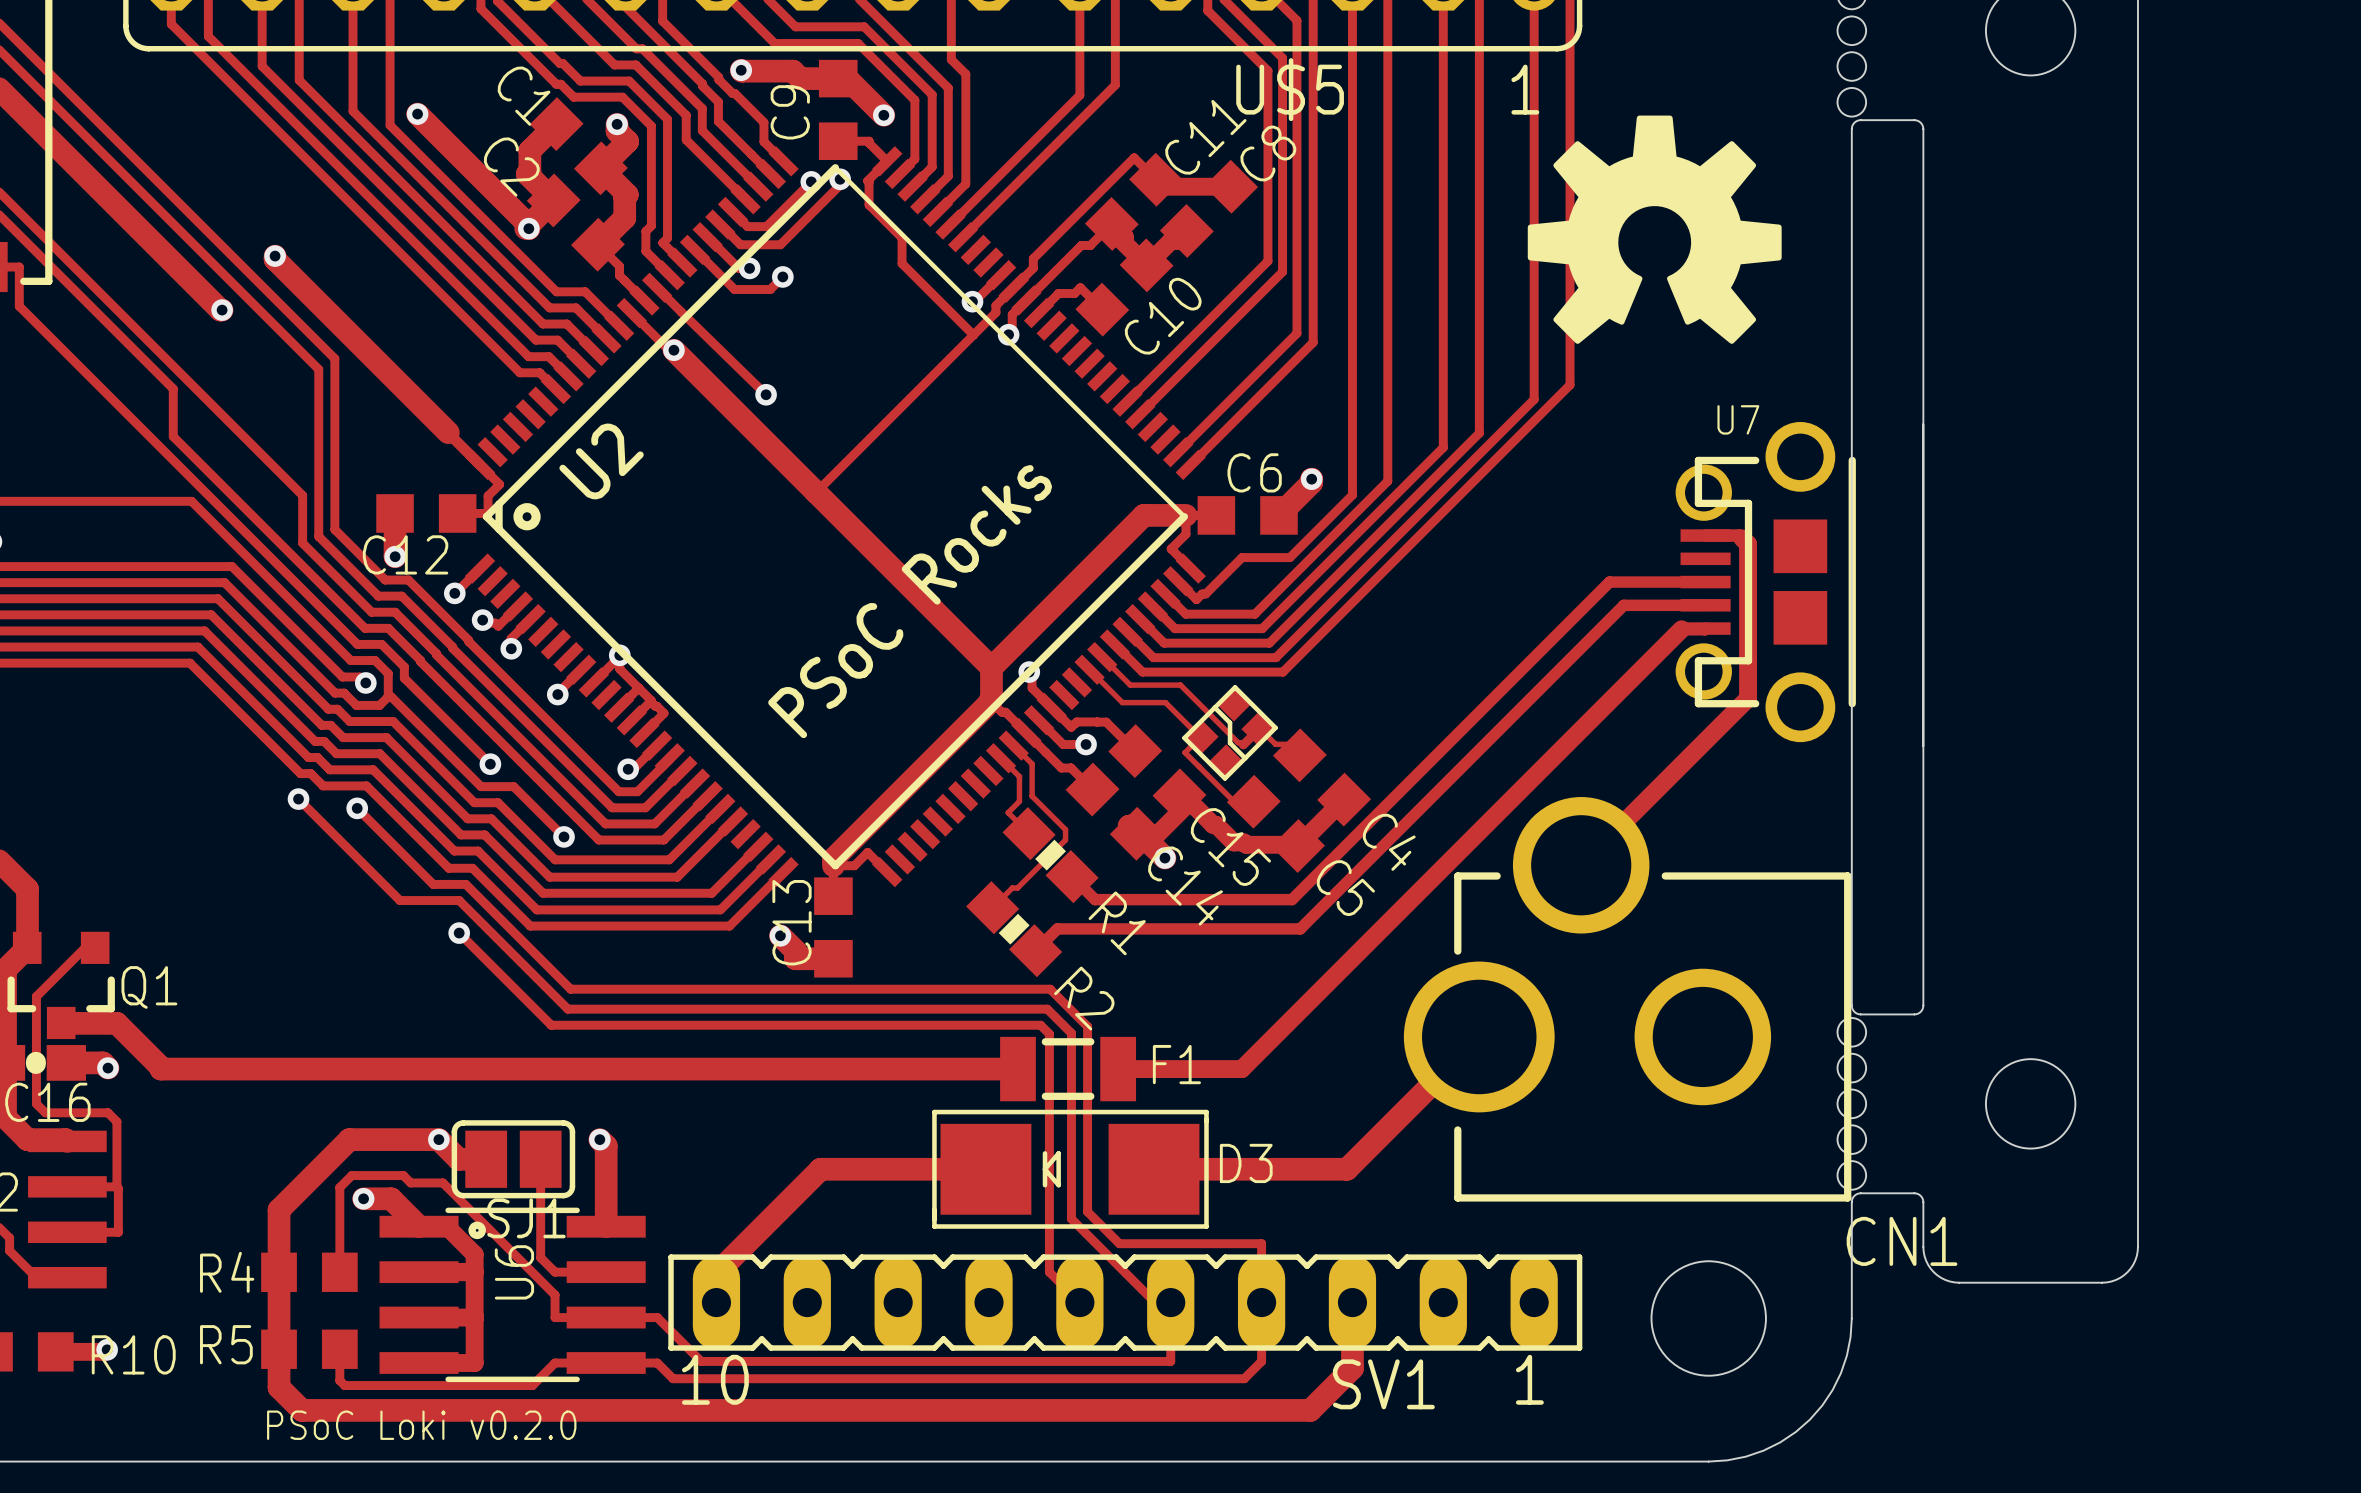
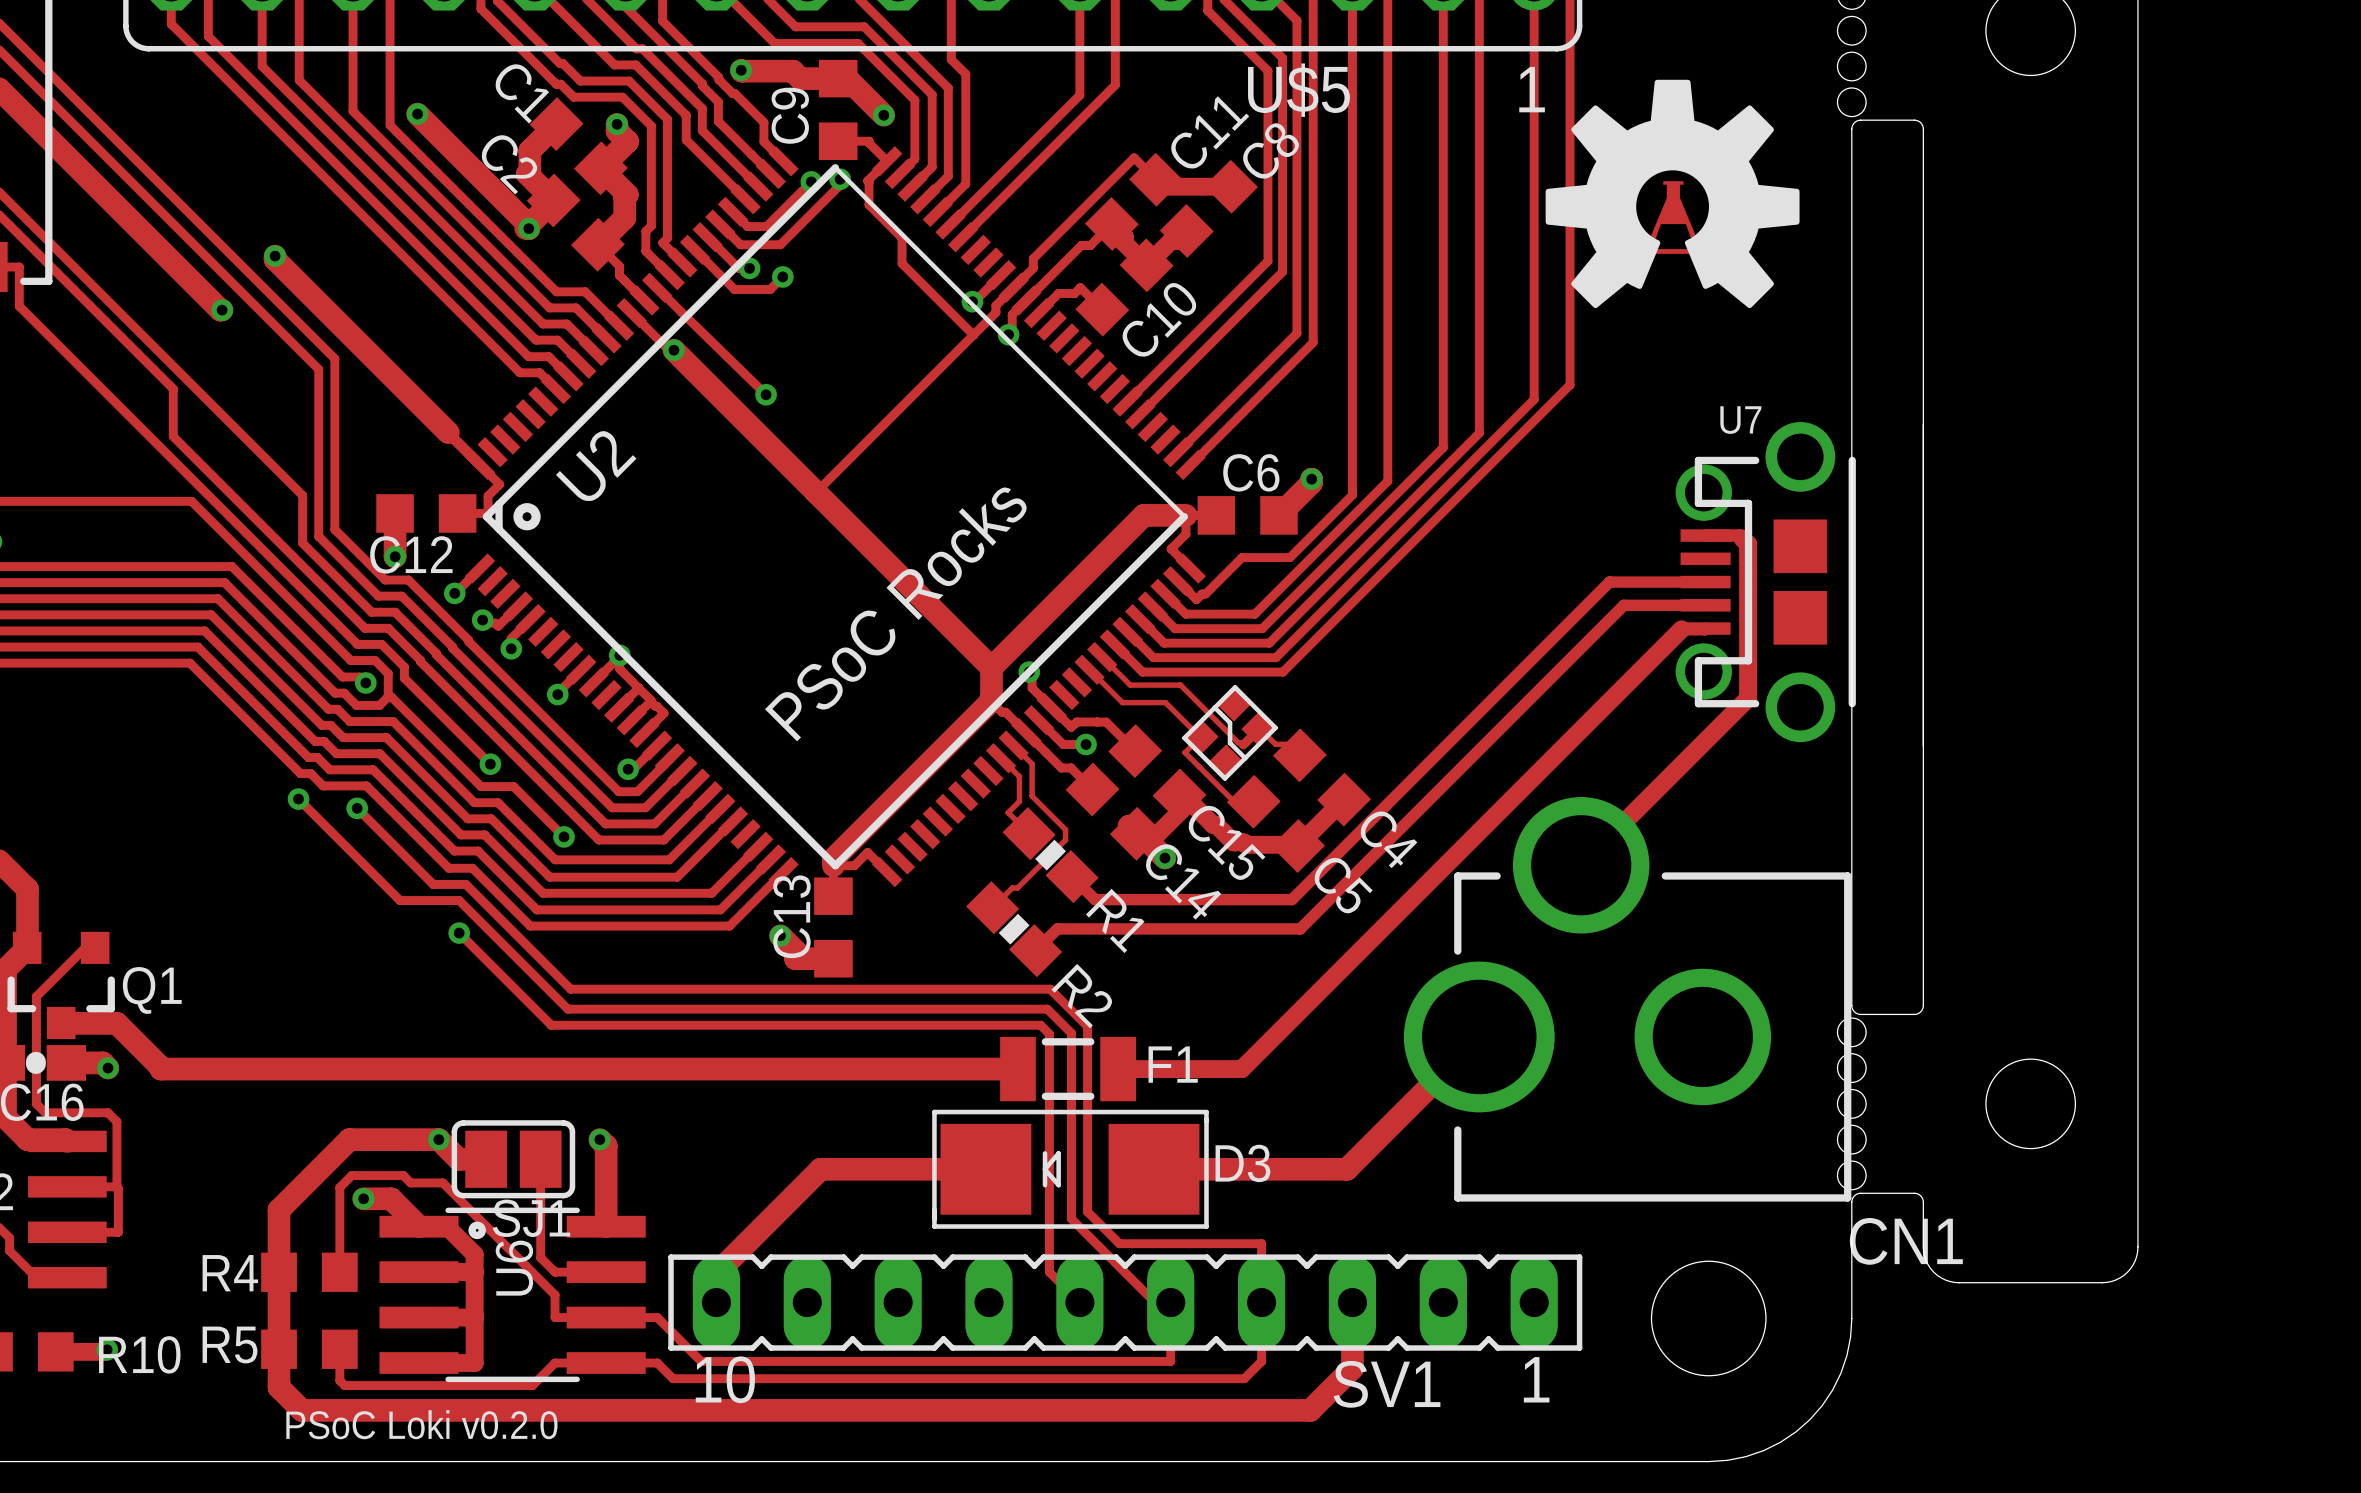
drawing: none -> [1648, 181, 1698, 254]
drawing position: (1654, 229) -> (1672, 193)

